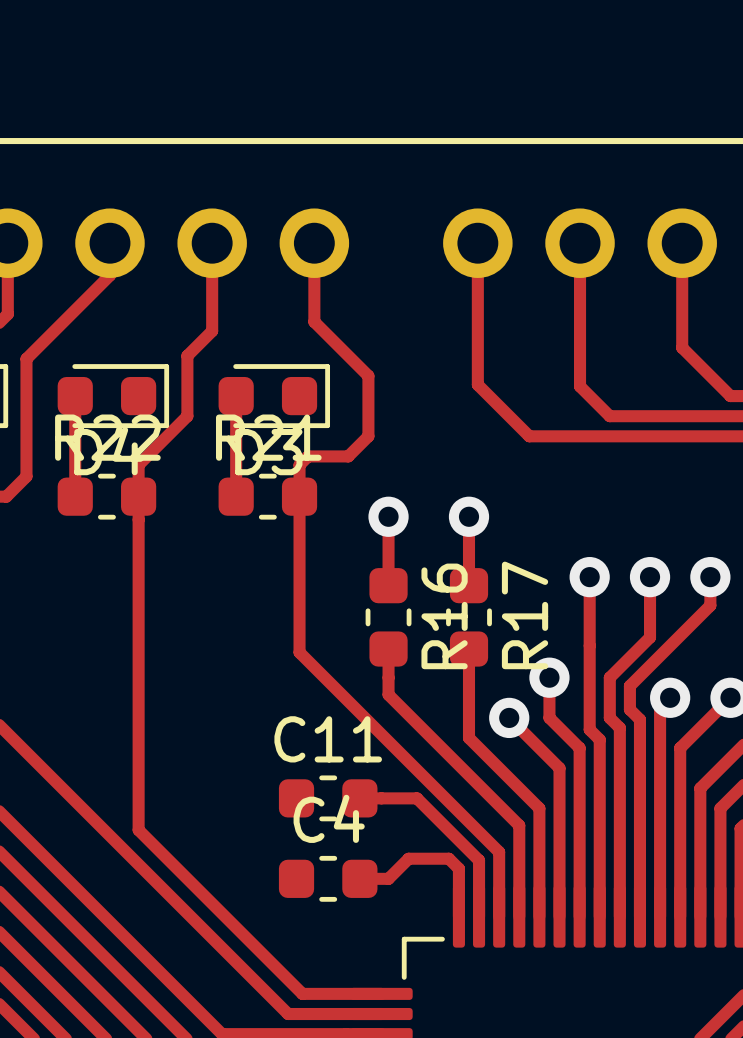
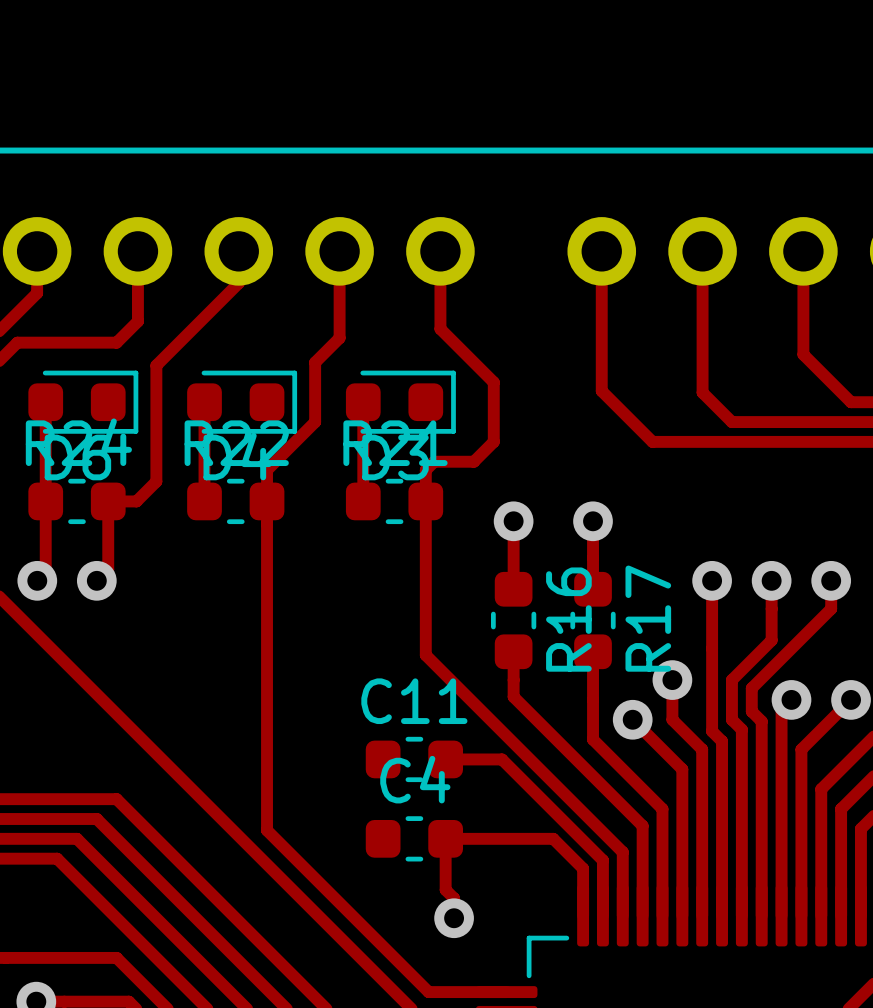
C11 position: (328, 798) -> (414, 759)
track: (359, 798) (416, 798) -> (445, 759) (502, 759) (541, 799)
track: (448, 858) (408, 858) (388, 878) (359, 878) -> (573, 858) (553, 838) (445, 838) (445, 889) (454, 898) (454, 918)
C4 position: (328, 878) -> (414, 838)
via: none -> (454, 918)

